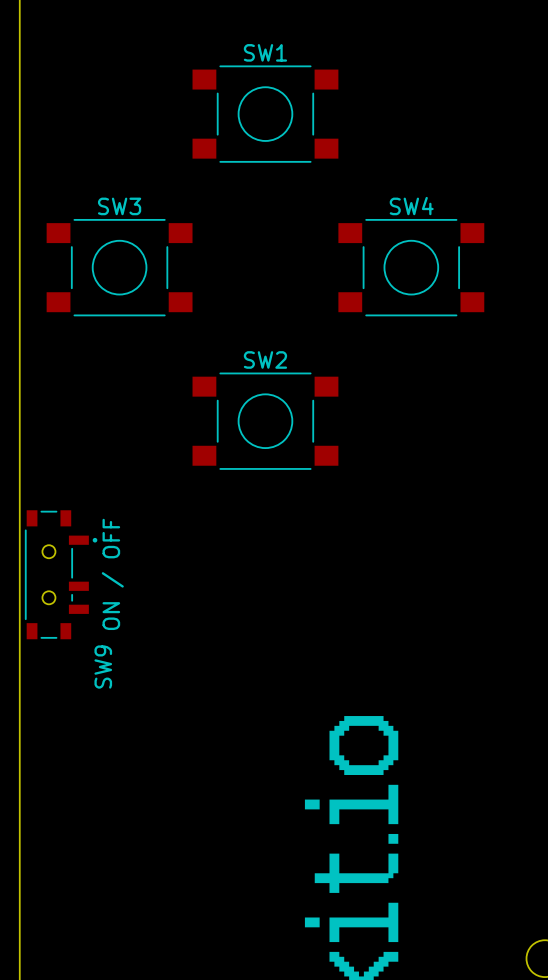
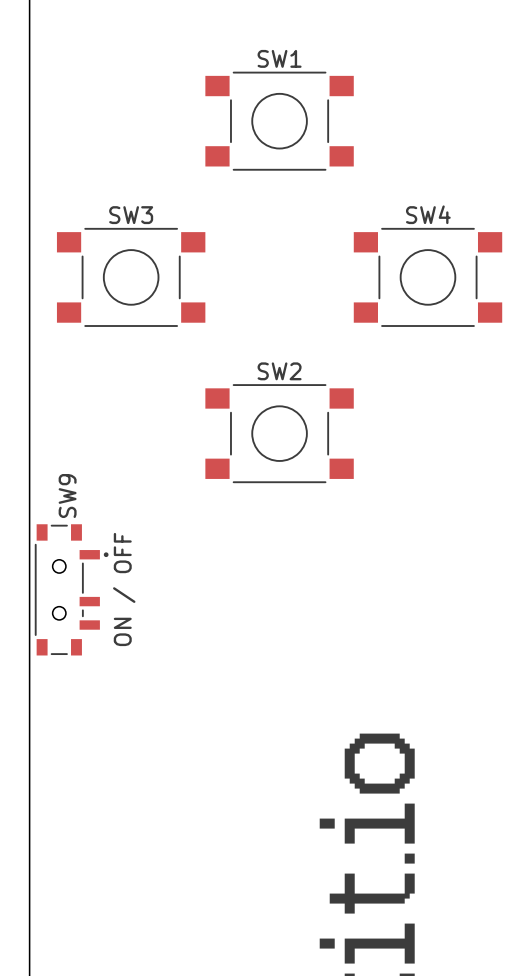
SW9 name position: SW9 (103, 667) -> SW9 (67, 496)

